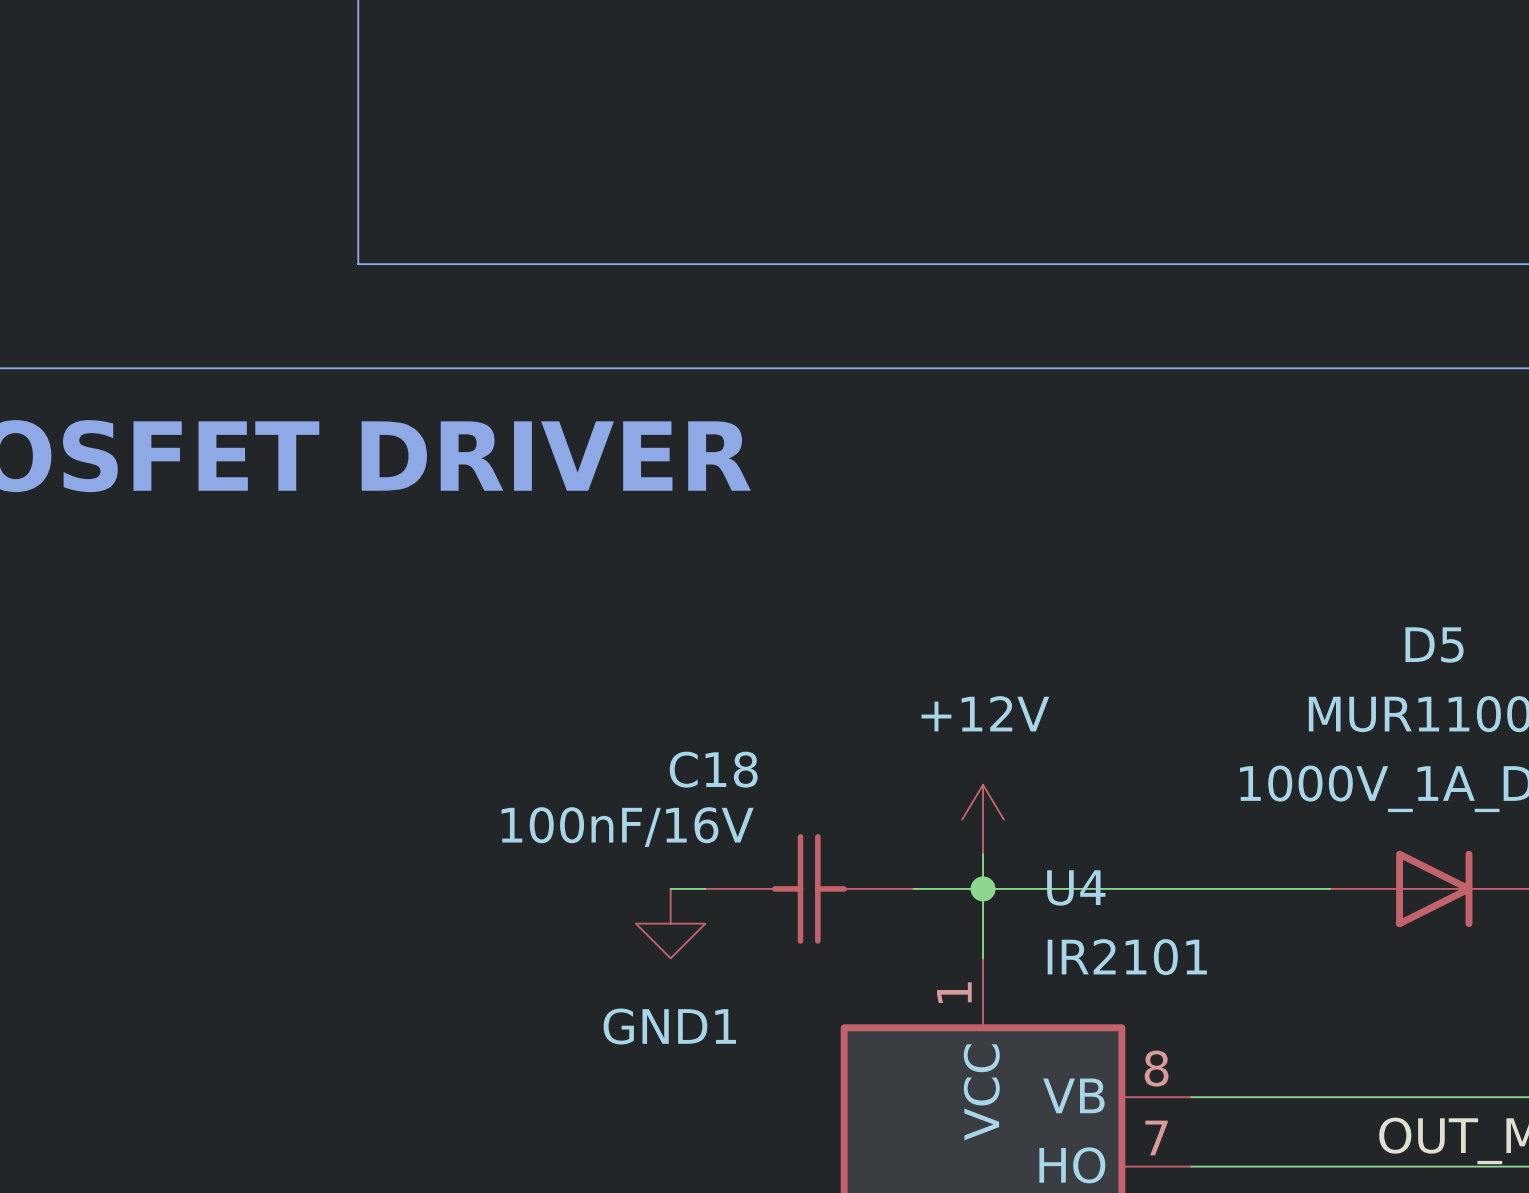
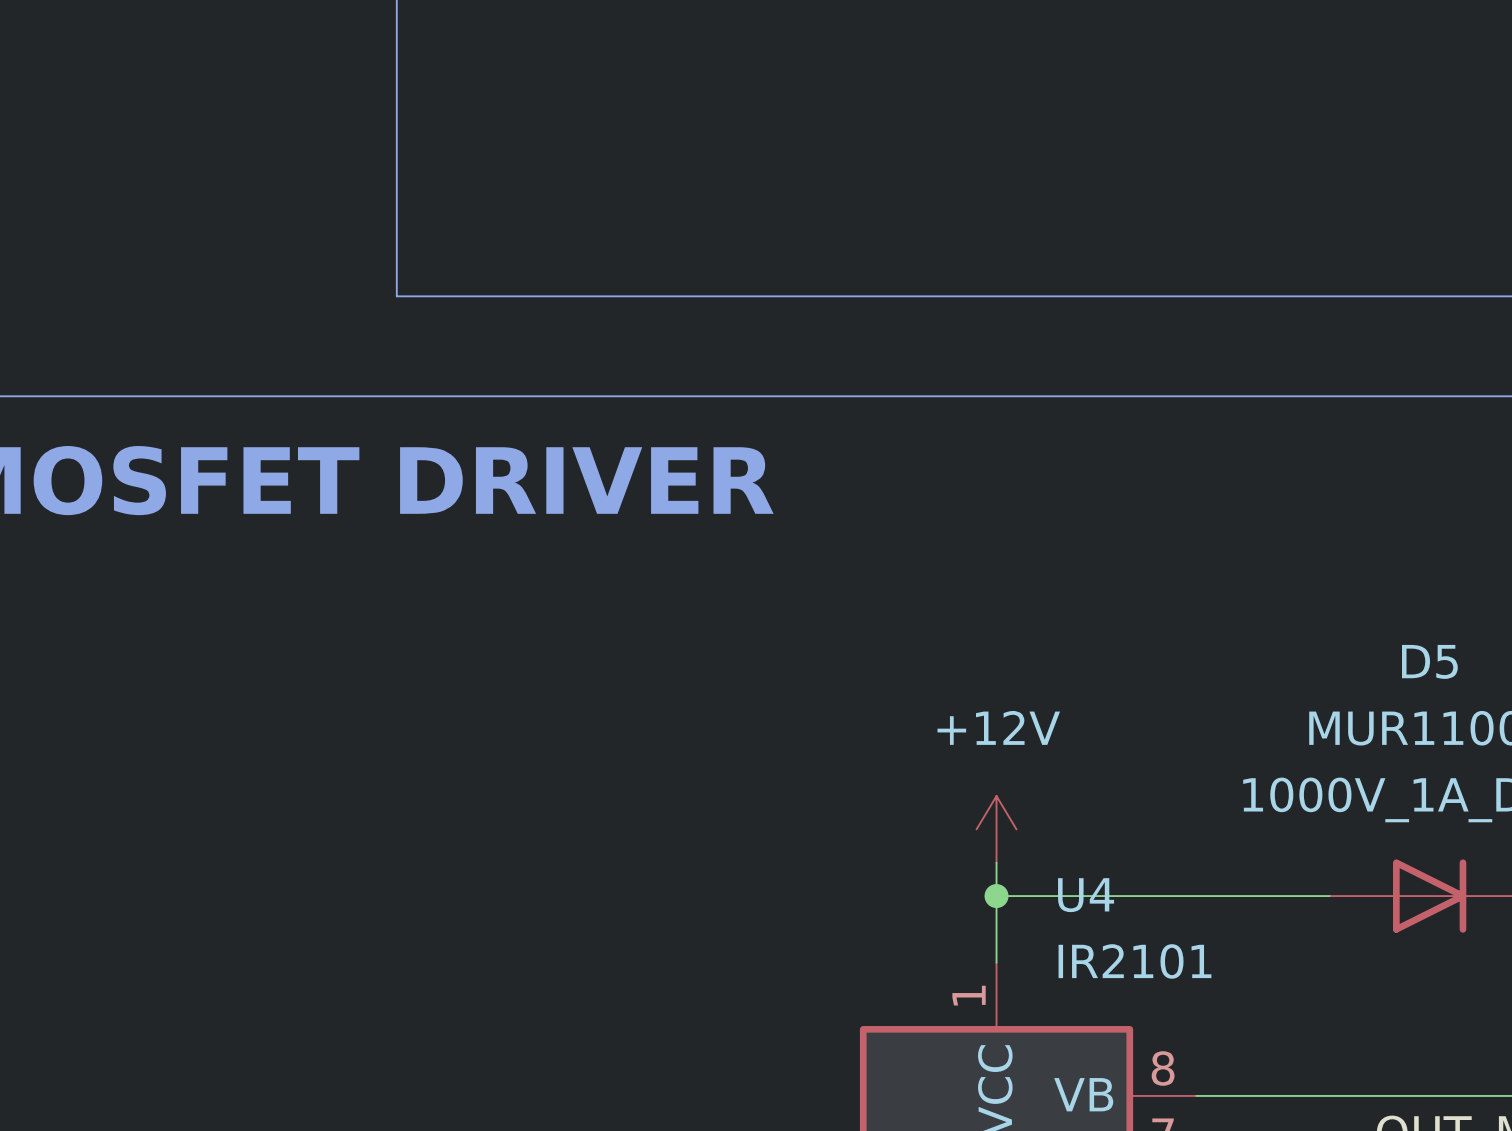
wire: (670, 888) (705, 888) -> none
C18: 100nF/16V (809, 888) -> none
wire: (913, 888) (983, 888) -> none
power symbol: GND1 (670, 923) -> none

